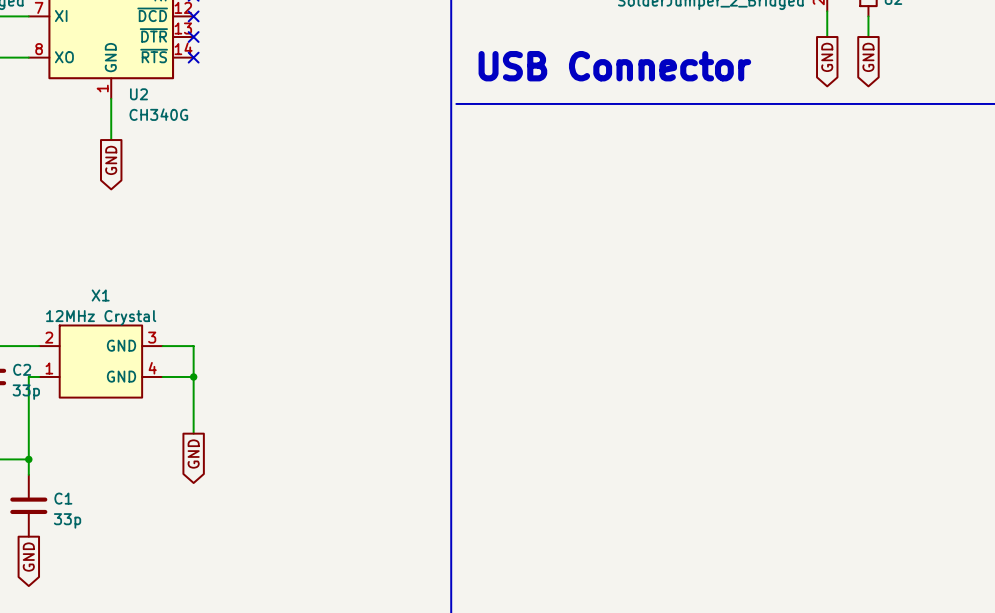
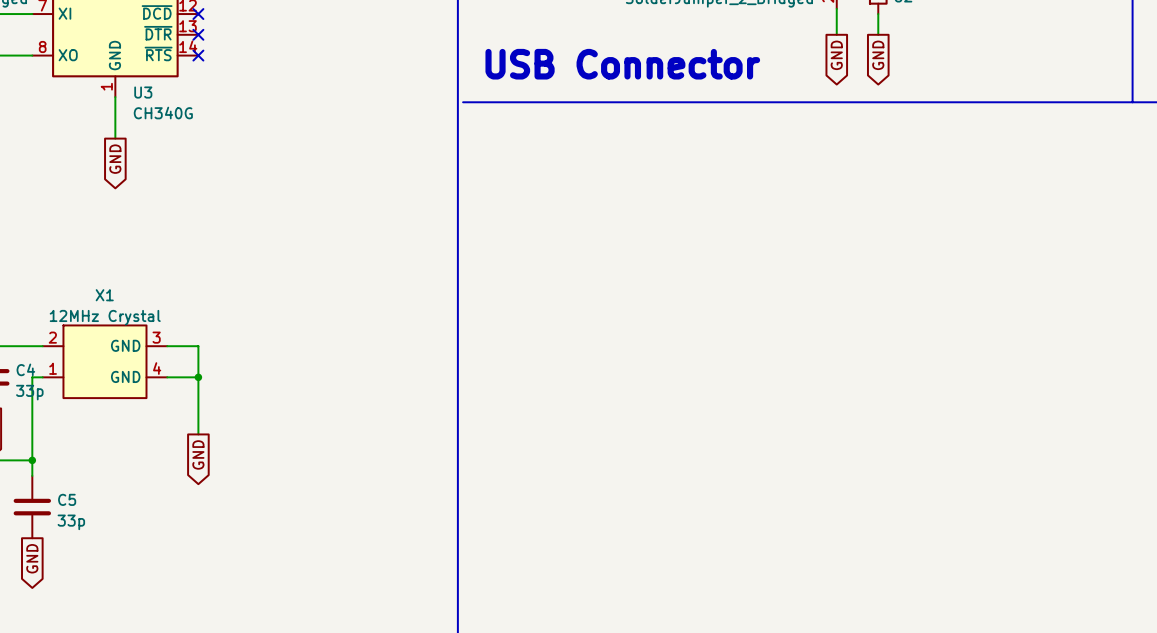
U2 name: U2 (138, 94) -> U3 (143, 92)
C2 name: C2 (22, 369) -> C4 (25, 369)
C1 name: C1 (63, 498) -> C5 (67, 499)

